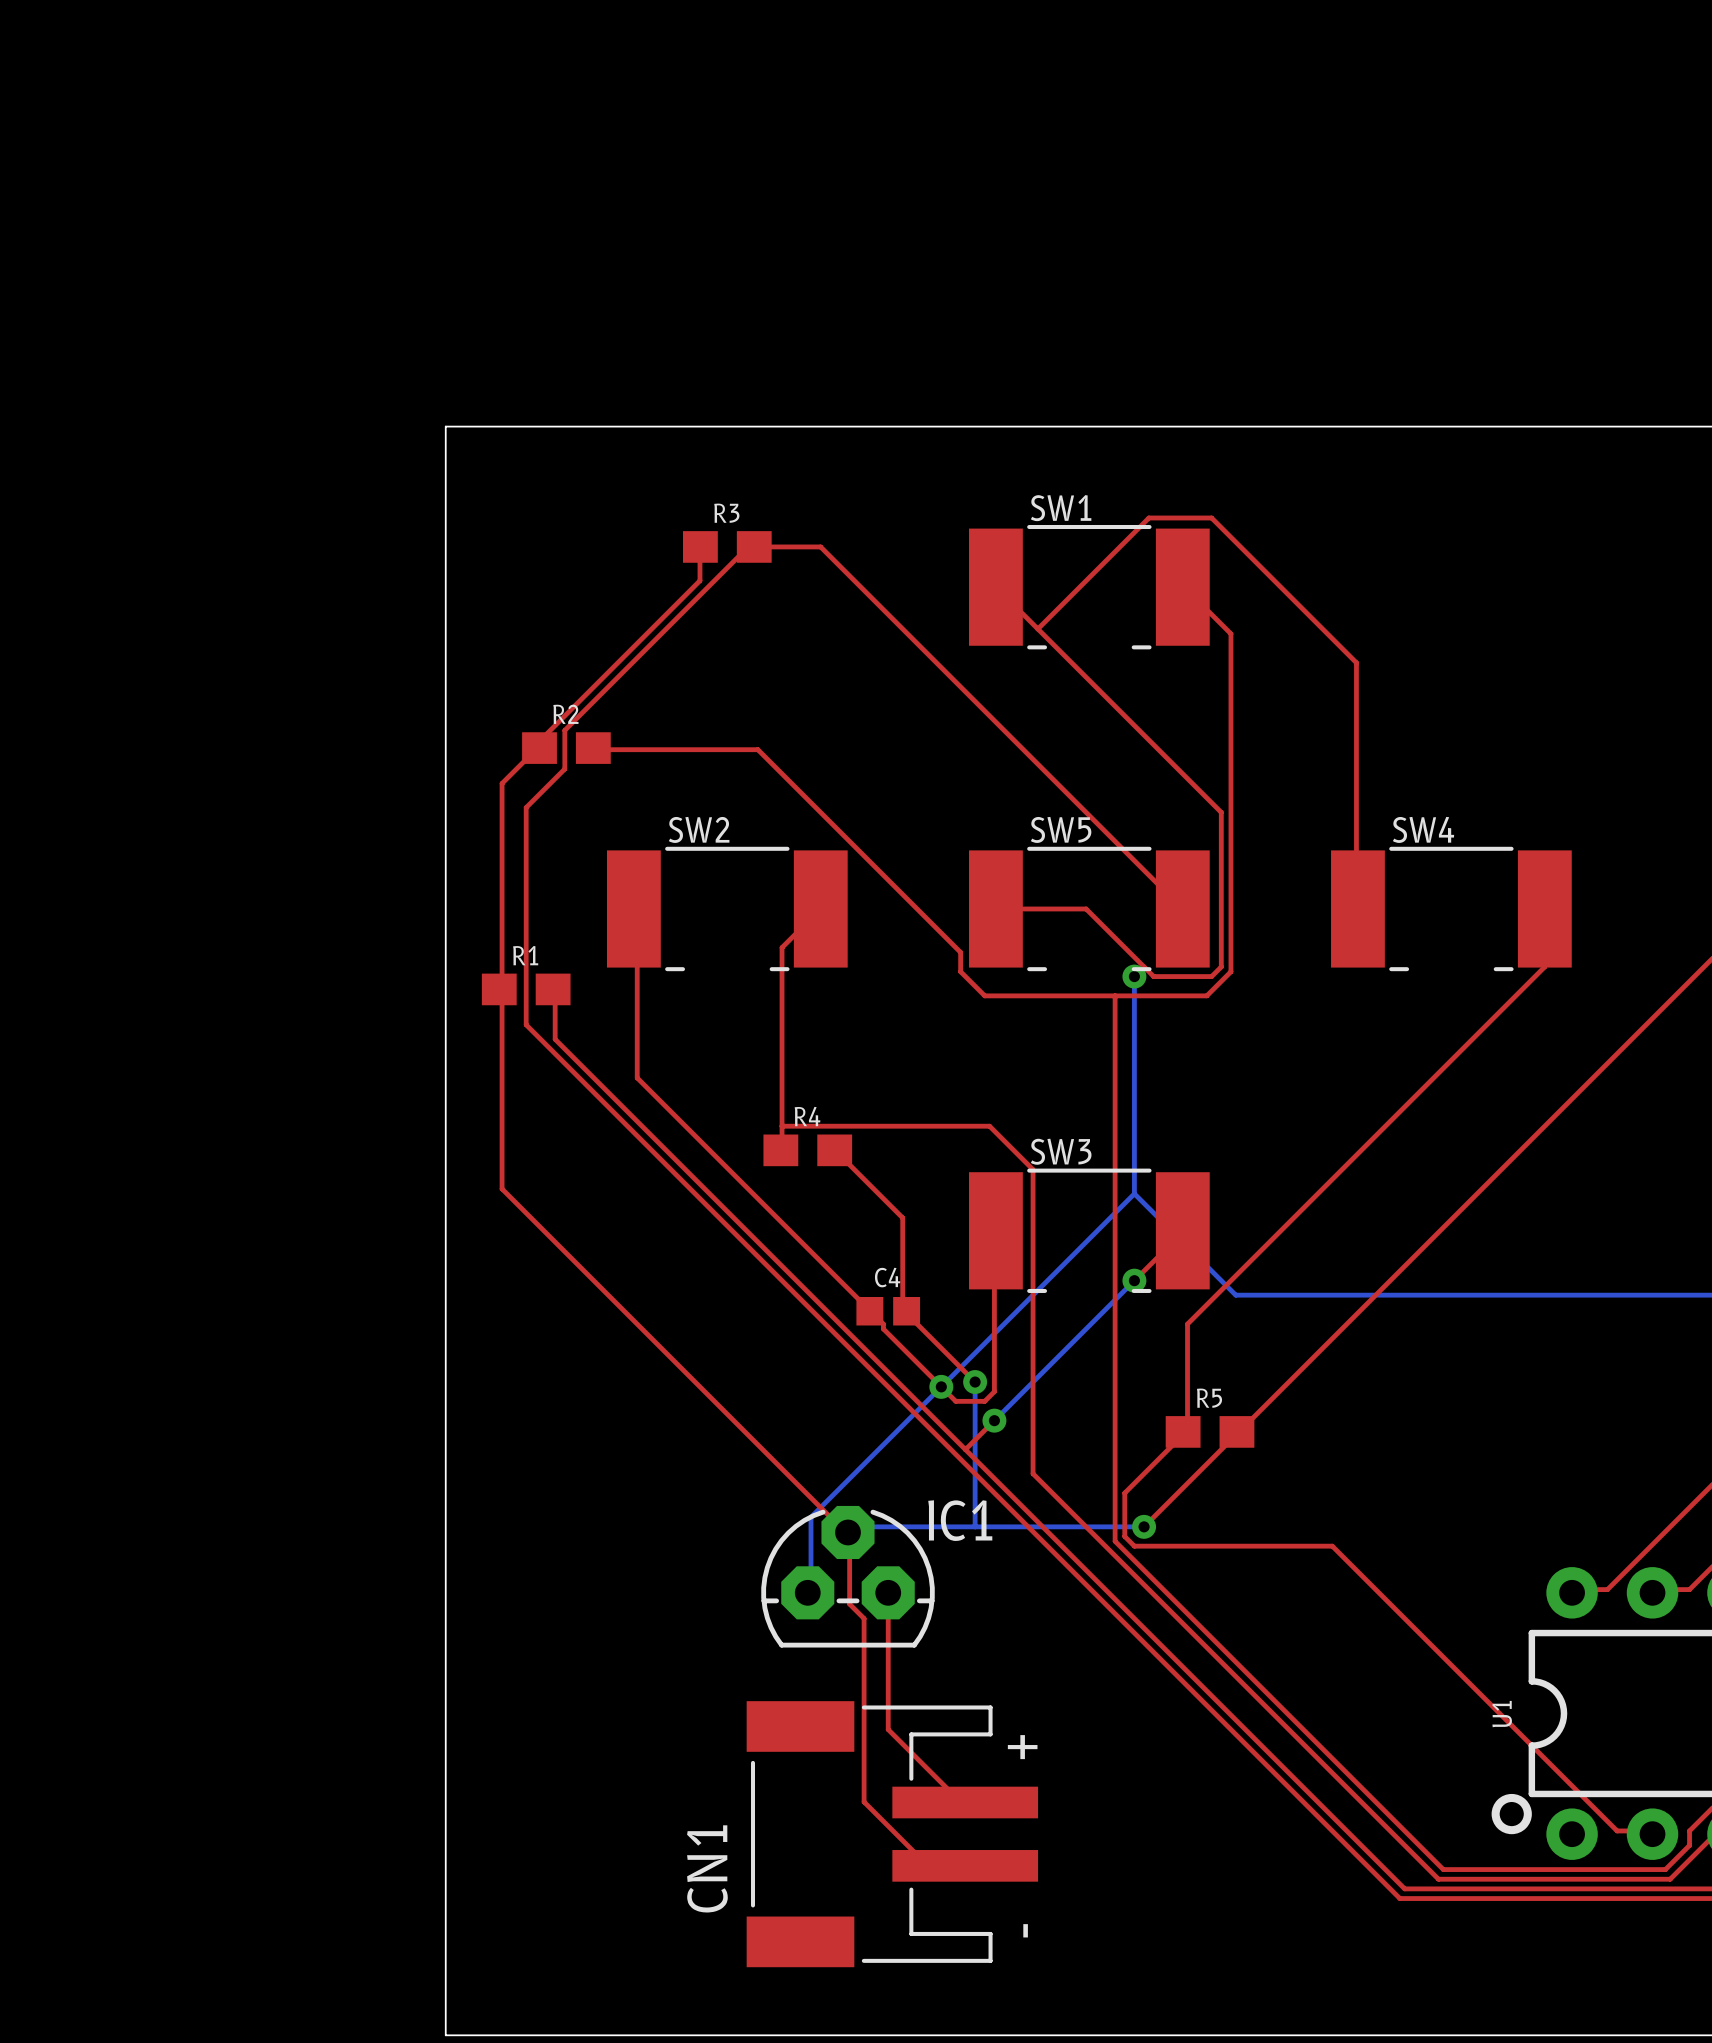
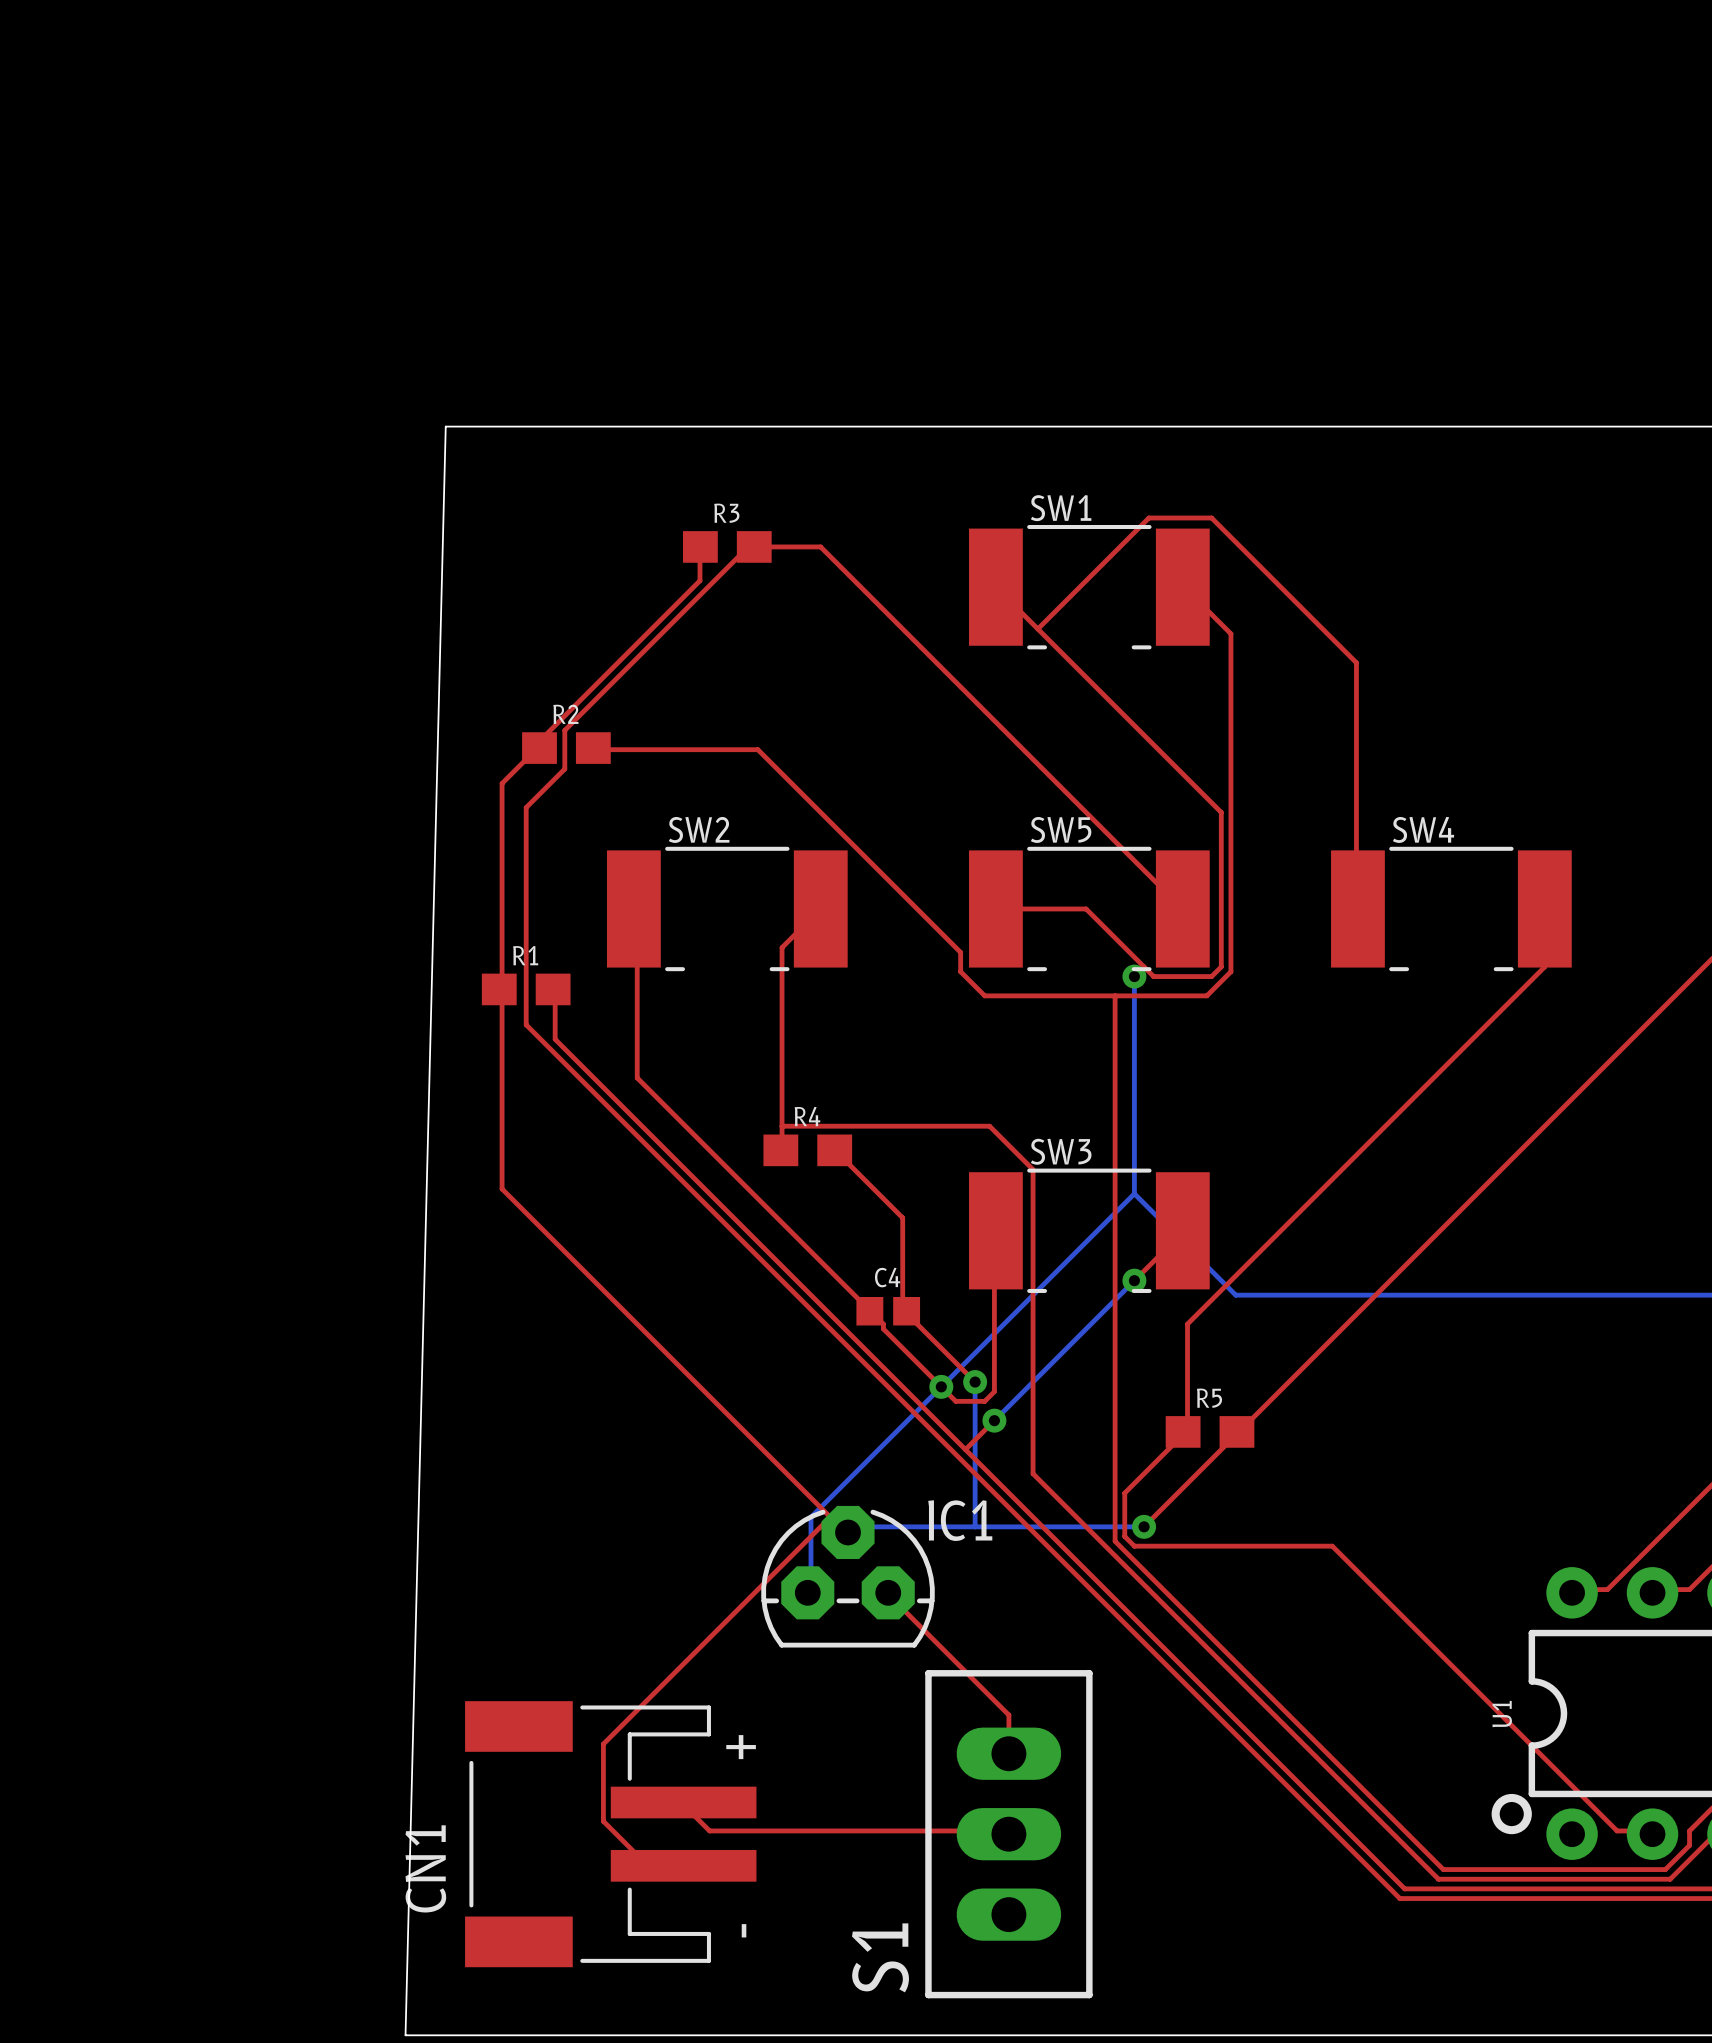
board edge: (445, 426) (445, 2035) -> (445, 426) (405, 2035) (445, 2035)
top track: (848, 1532) (849, 1536) (849, 1604) (864, 1618) (864, 1801) (926, 1864) (965, 1865) -> (848, 1532) (830, 1517) (603, 1744) (603, 1821) (646, 1864) (683, 1865)
top track: (888, 1594) (888, 1729) (960, 1801) (965, 1802) -> (888, 1594) (1008, 1715) (1008, 1753)
top track: none -> (683, 1802) (685, 1806) (709, 1830) (1008, 1830) (1008, 1834)
CN1 position: (892, 1834) -> (610, 1834)
S1: none -> (1008, 1834)

